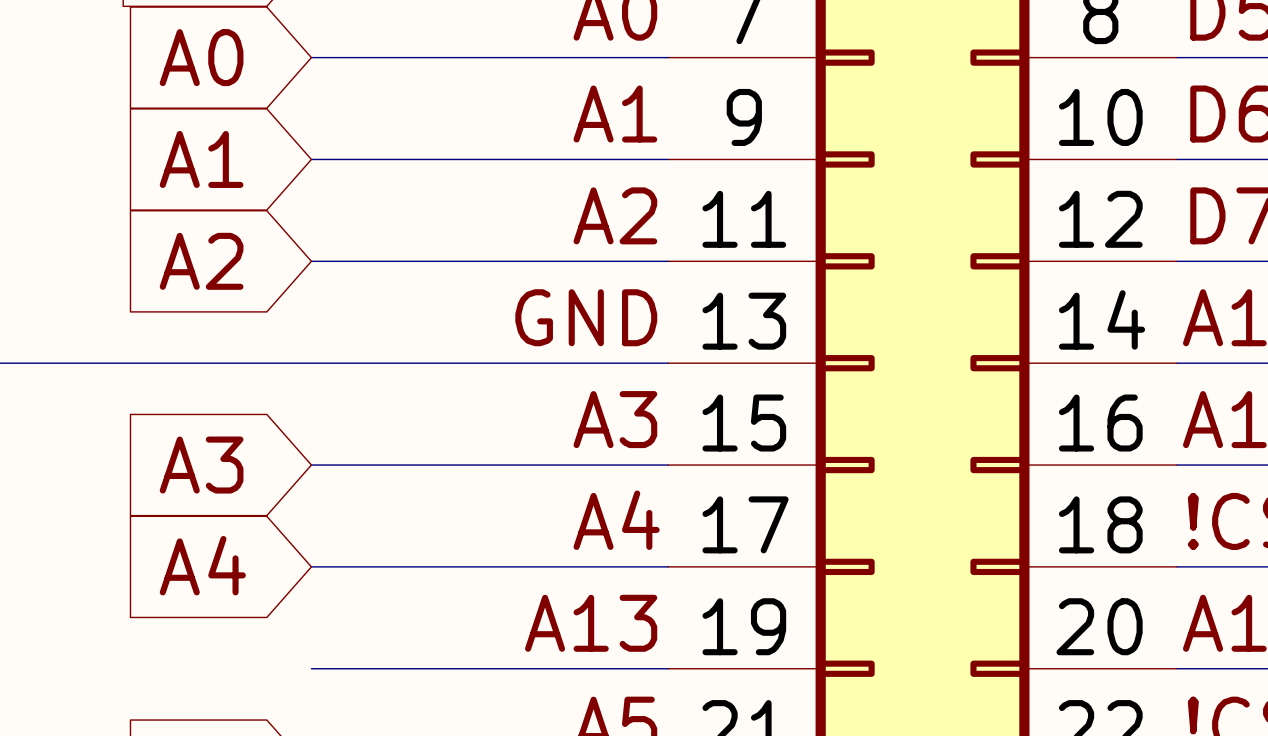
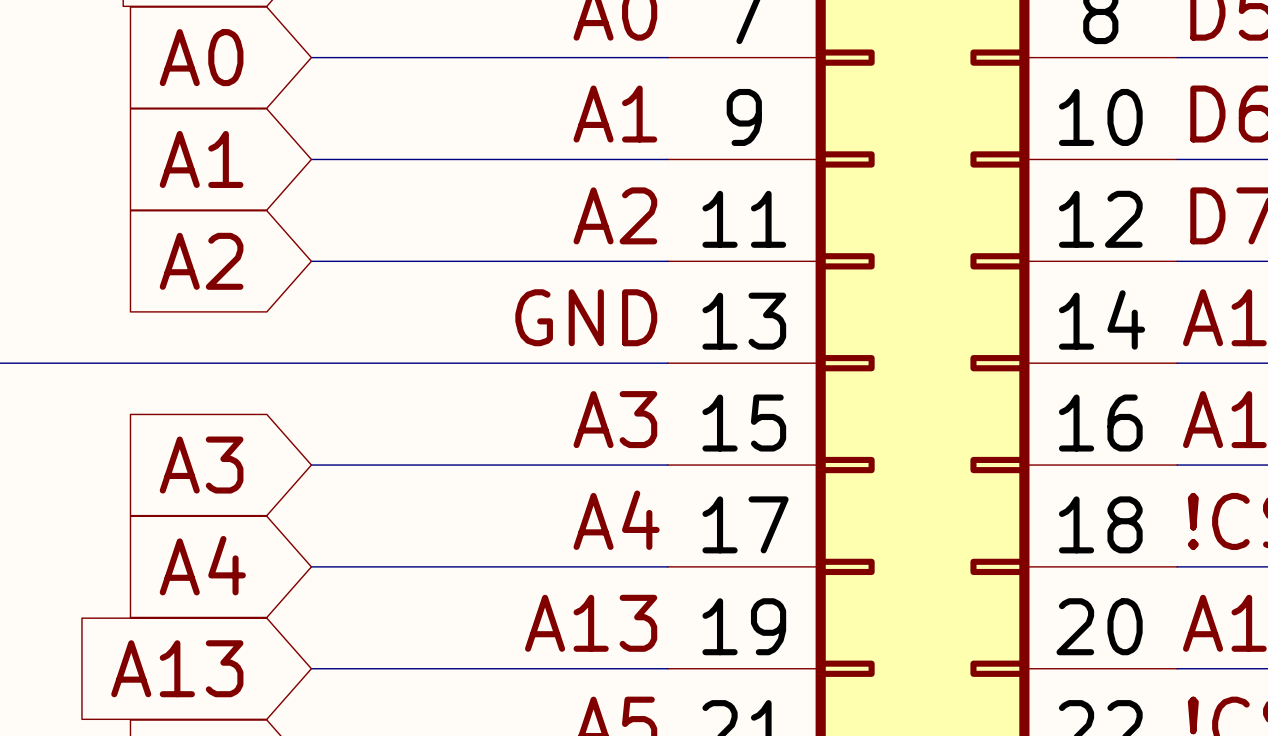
global label: none -> A13 (177, 668)

